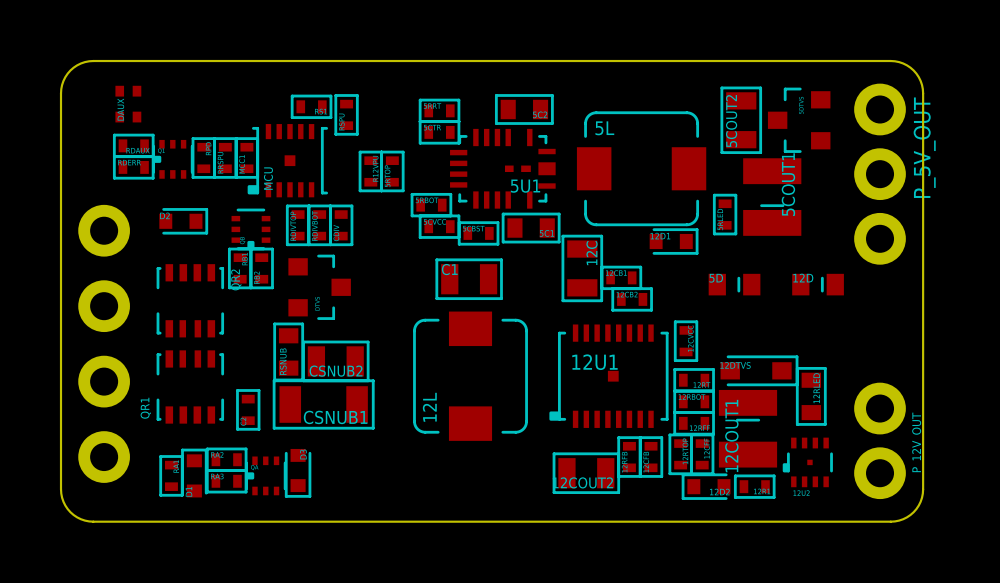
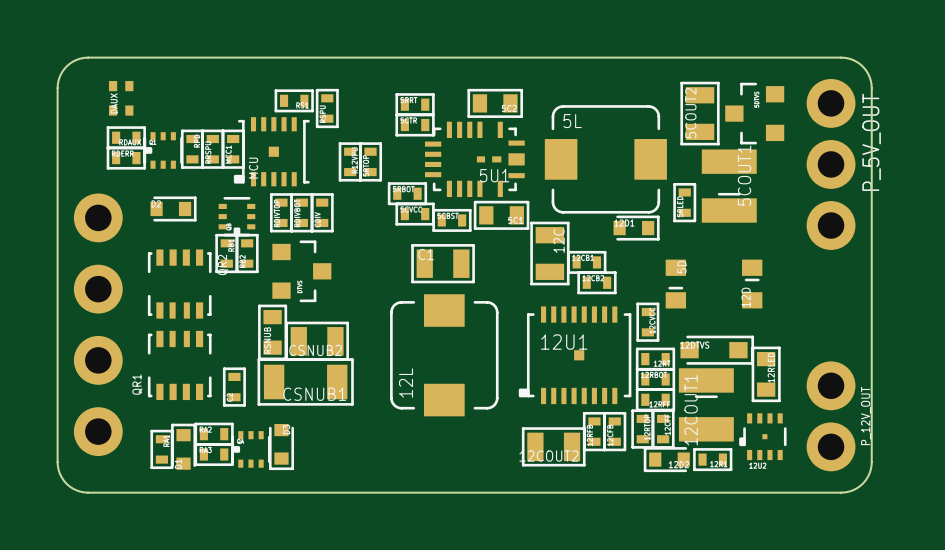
5D rotation: 0° (734, 284) -> 90° clockwise (675, 284)
12D rotation: 0° (818, 284) -> 90° counterclockwise (752, 284)

